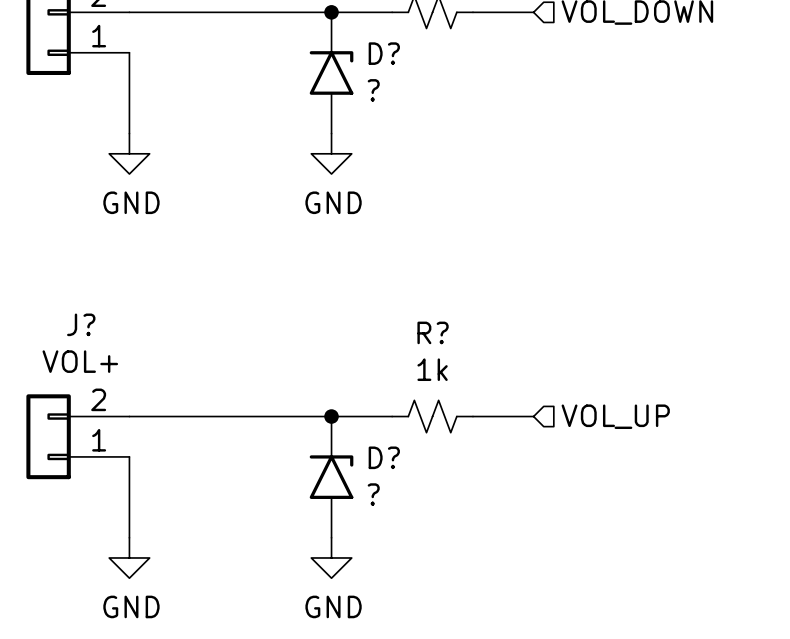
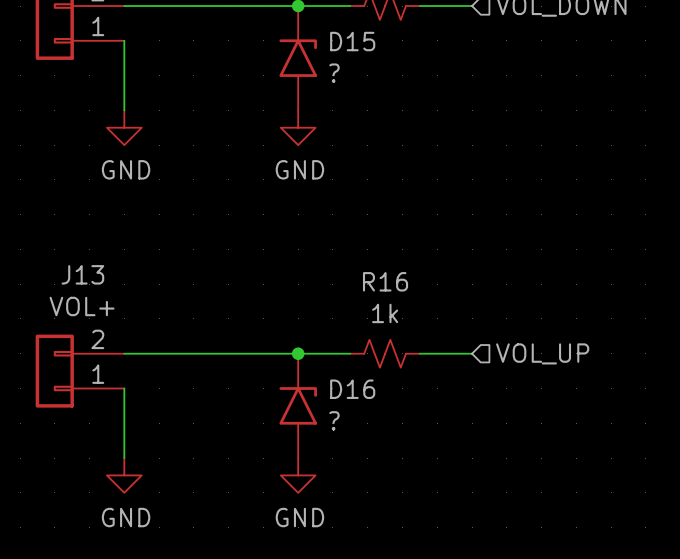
D? name: D? (384, 53) -> D15 (352, 41)
J? name: J? (81, 324) -> J13 (82, 274)
R? name: R? (433, 332) -> R16 (385, 281)
D? name: D? (384, 457) -> D16 (352, 389)

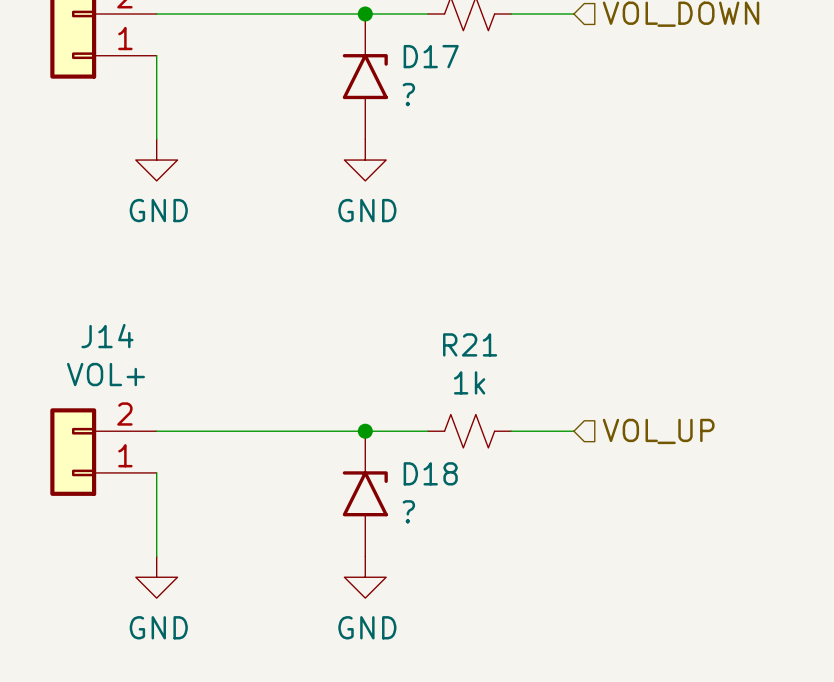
D15 name: D15 (352, 41) -> D17 (431, 56)
J13 name: J13 (82, 274) -> J14 (107, 336)
R16 name: R16 (385, 281) -> R21 (470, 344)
D16 name: D16 (352, 389) -> D18 (430, 473)

